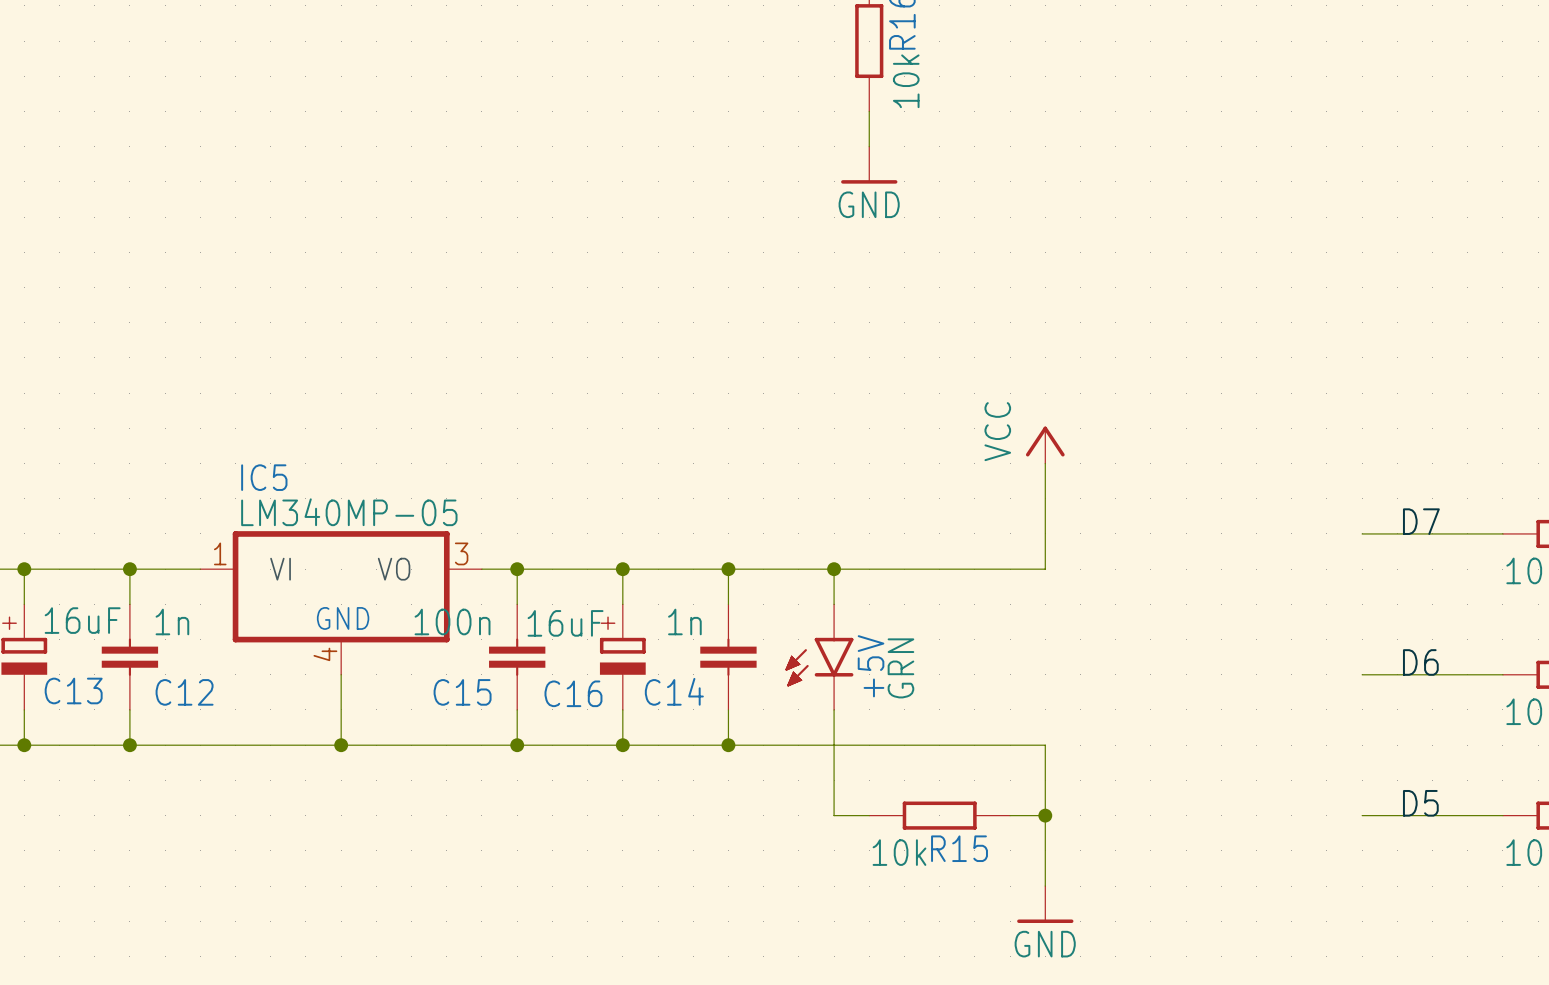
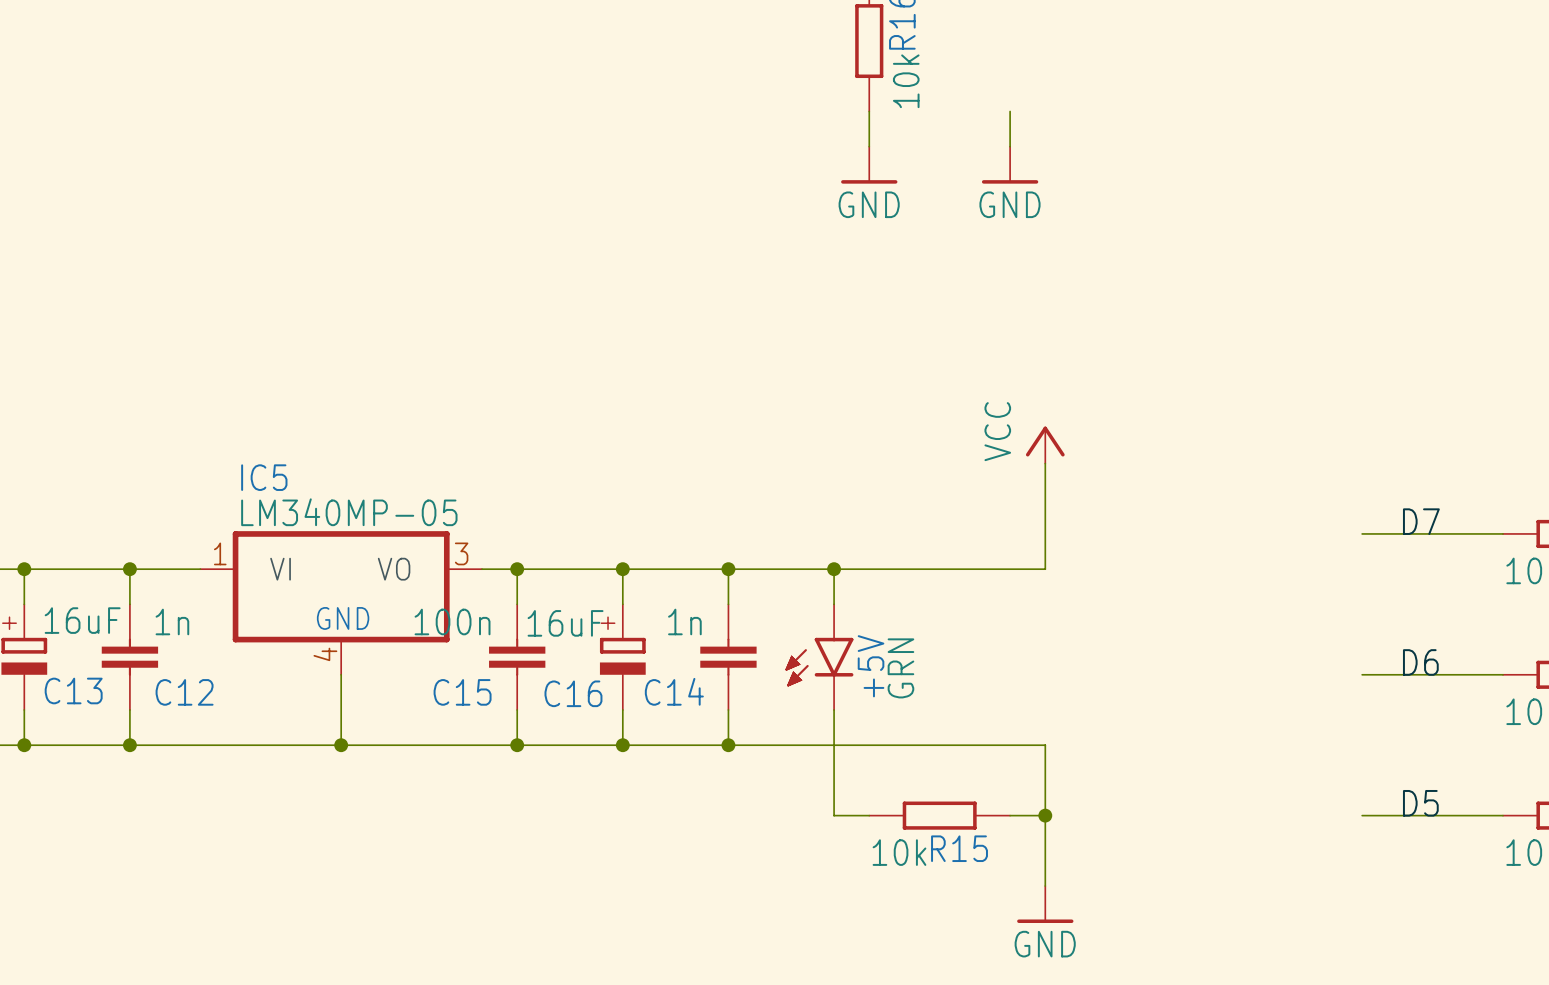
wire: none -> (1010, 111) (1010, 146)
power symbol: none -> GND (1010, 165)

